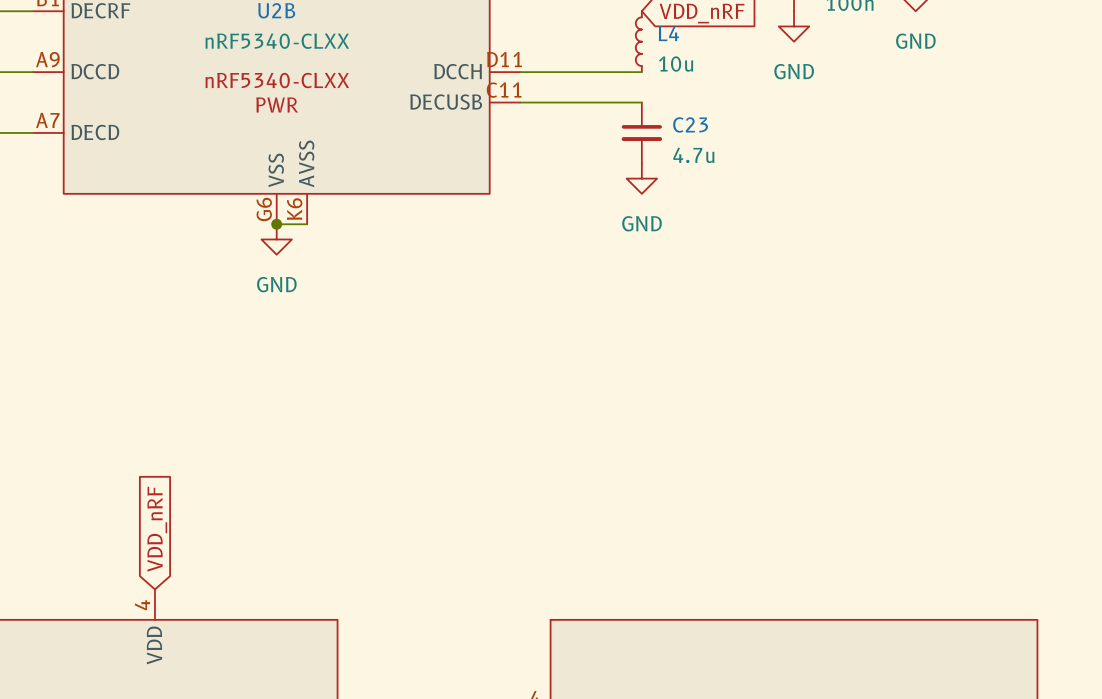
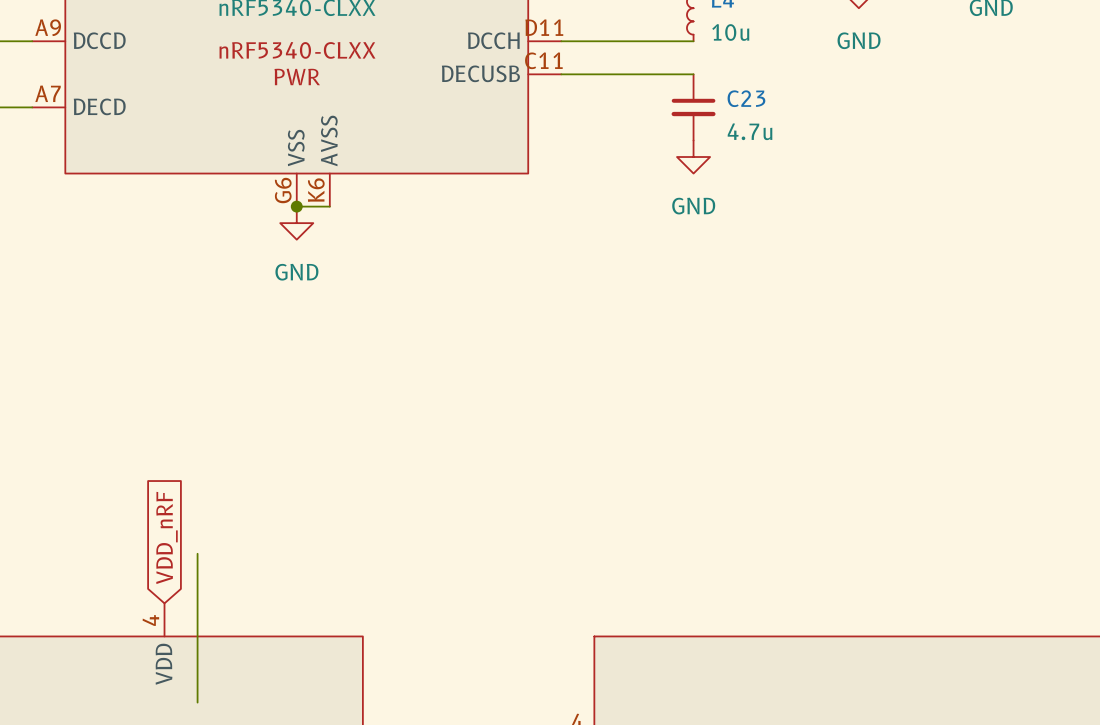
wire: none -> (197, 553) (197, 702)

